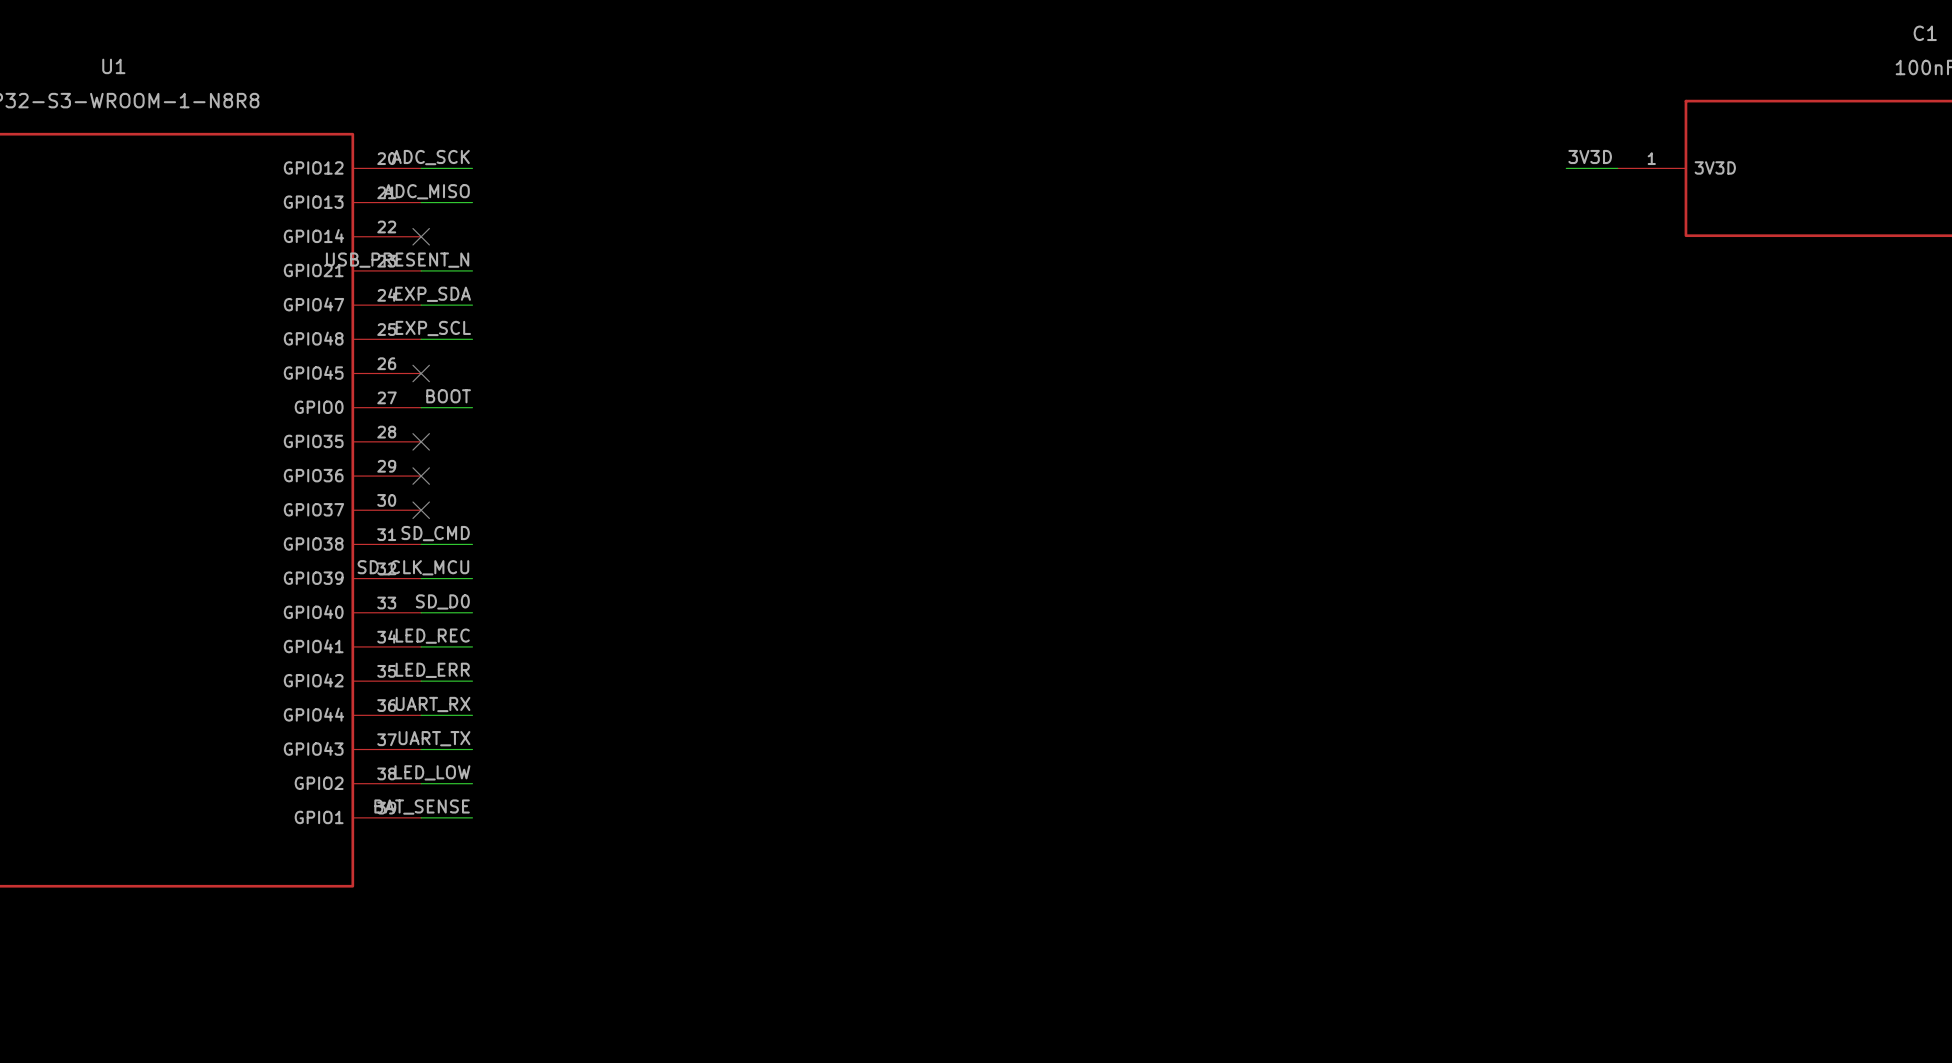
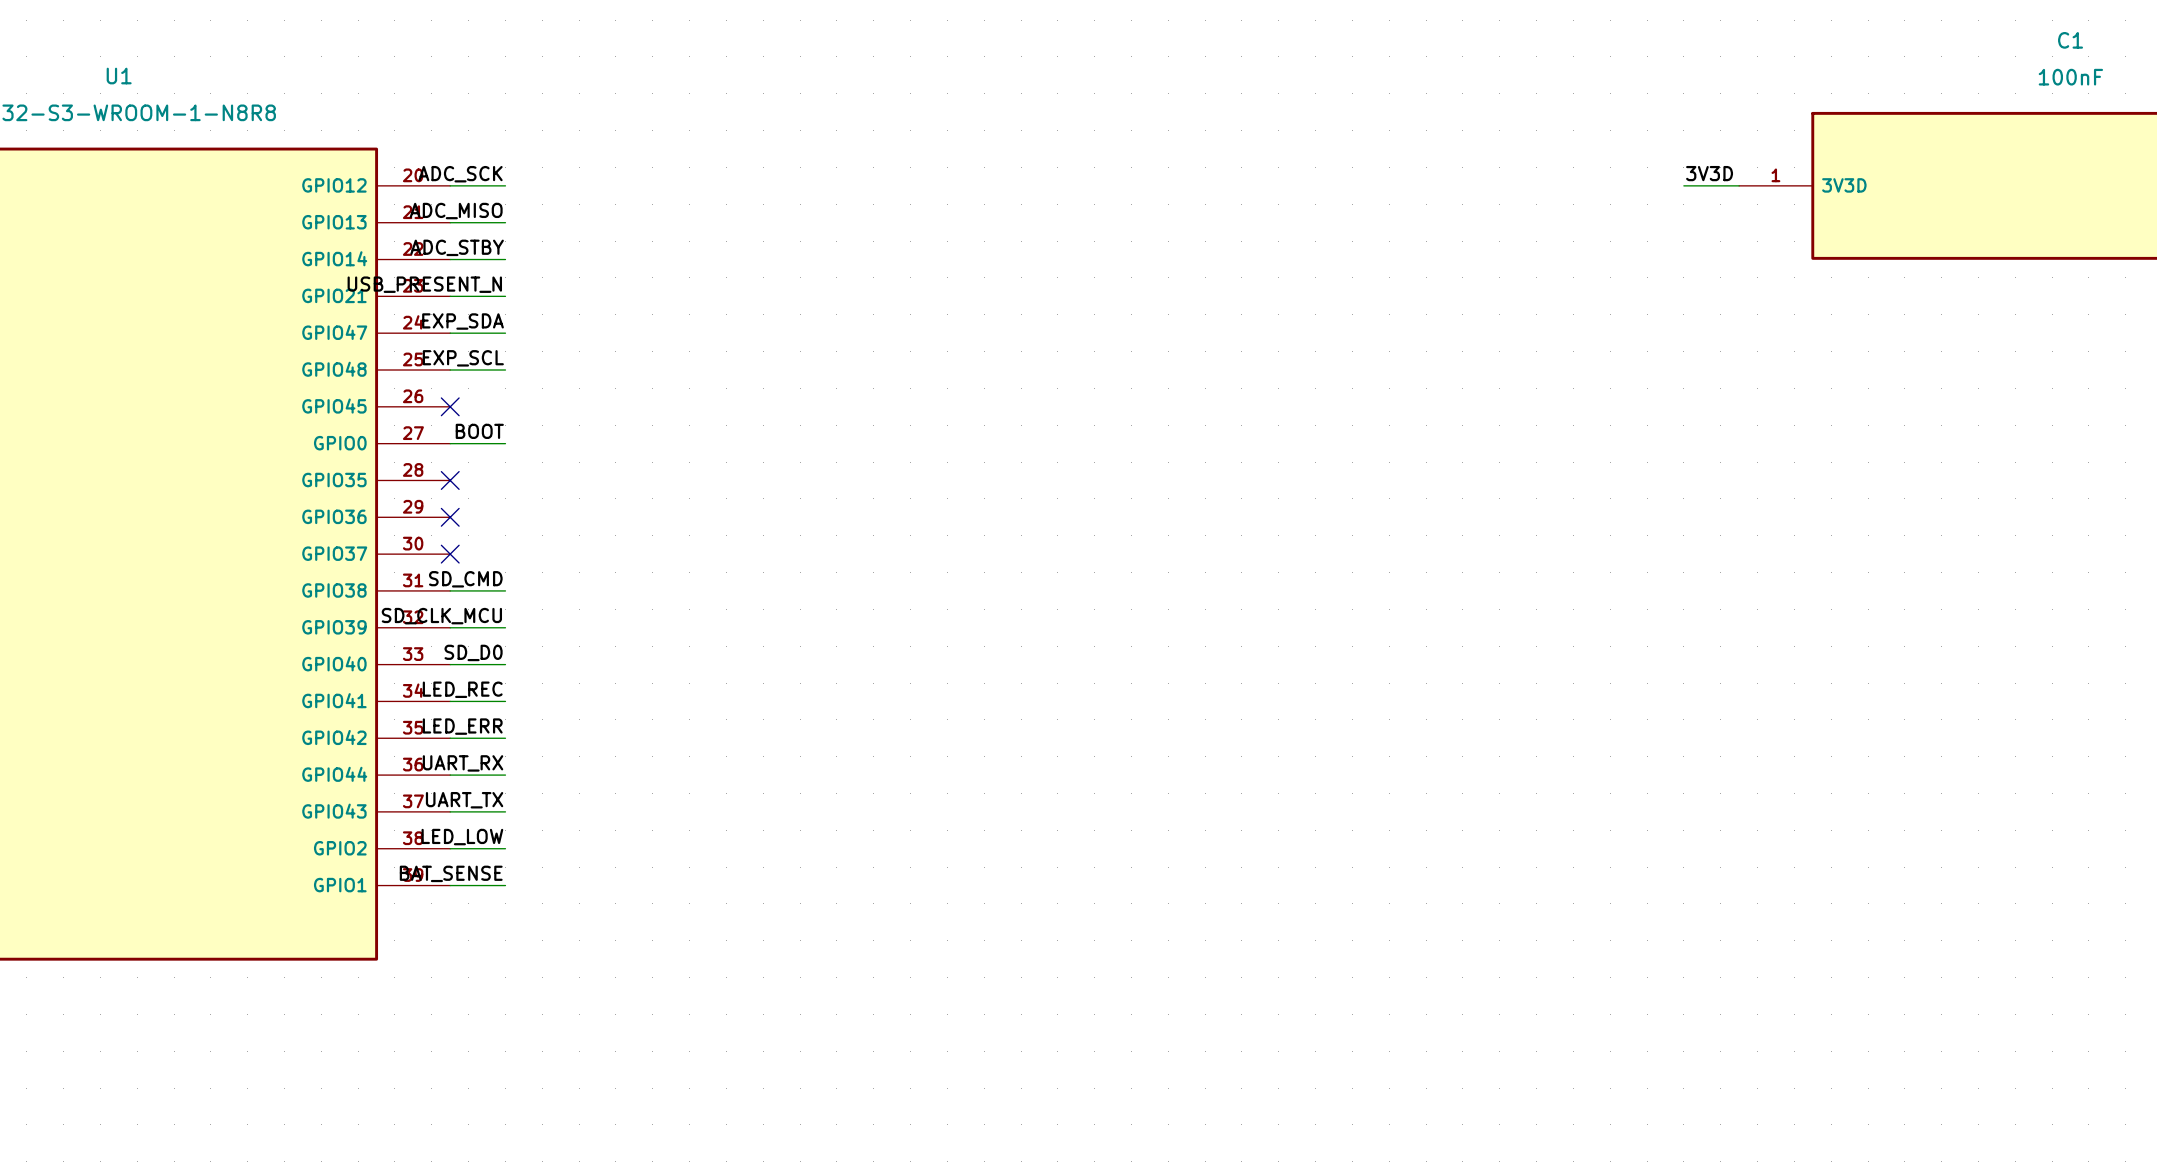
label: none -> ADC_STBY (457, 247)
wire: none -> (450, 259) (505, 259)
no-connect mark: (421, 236) -> none

